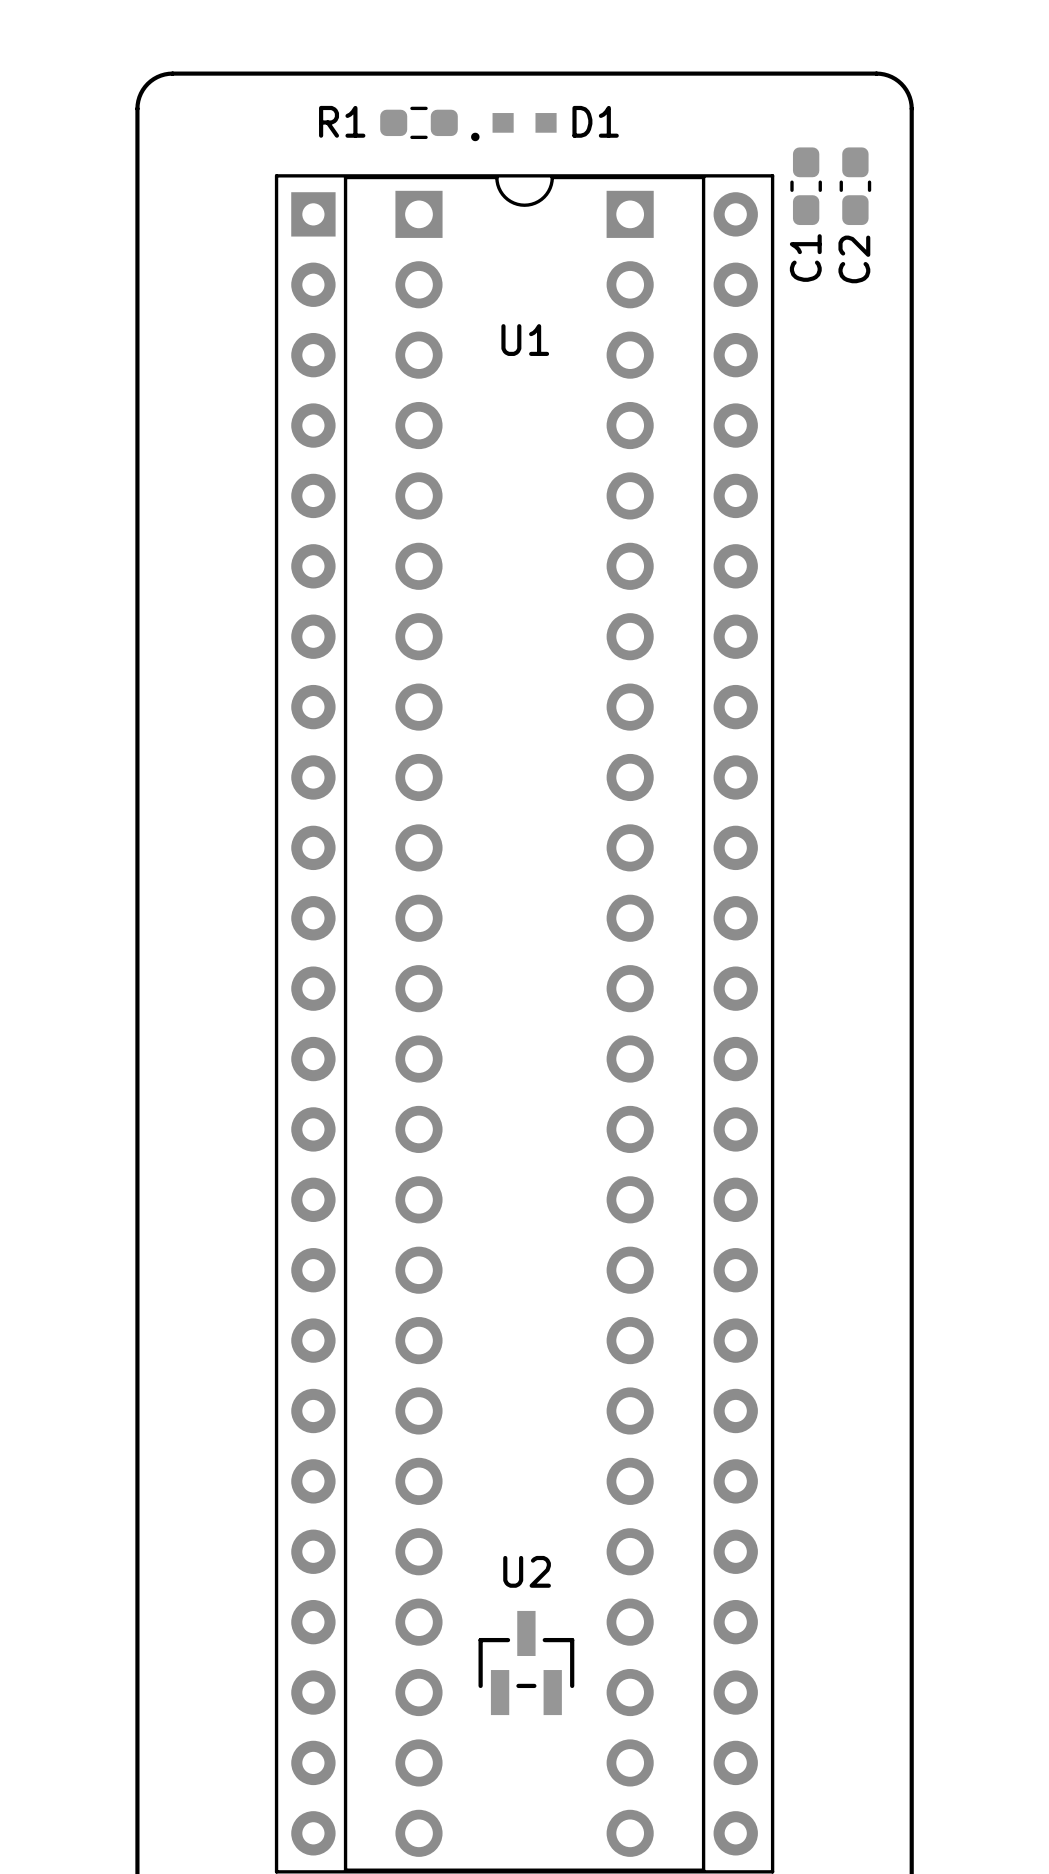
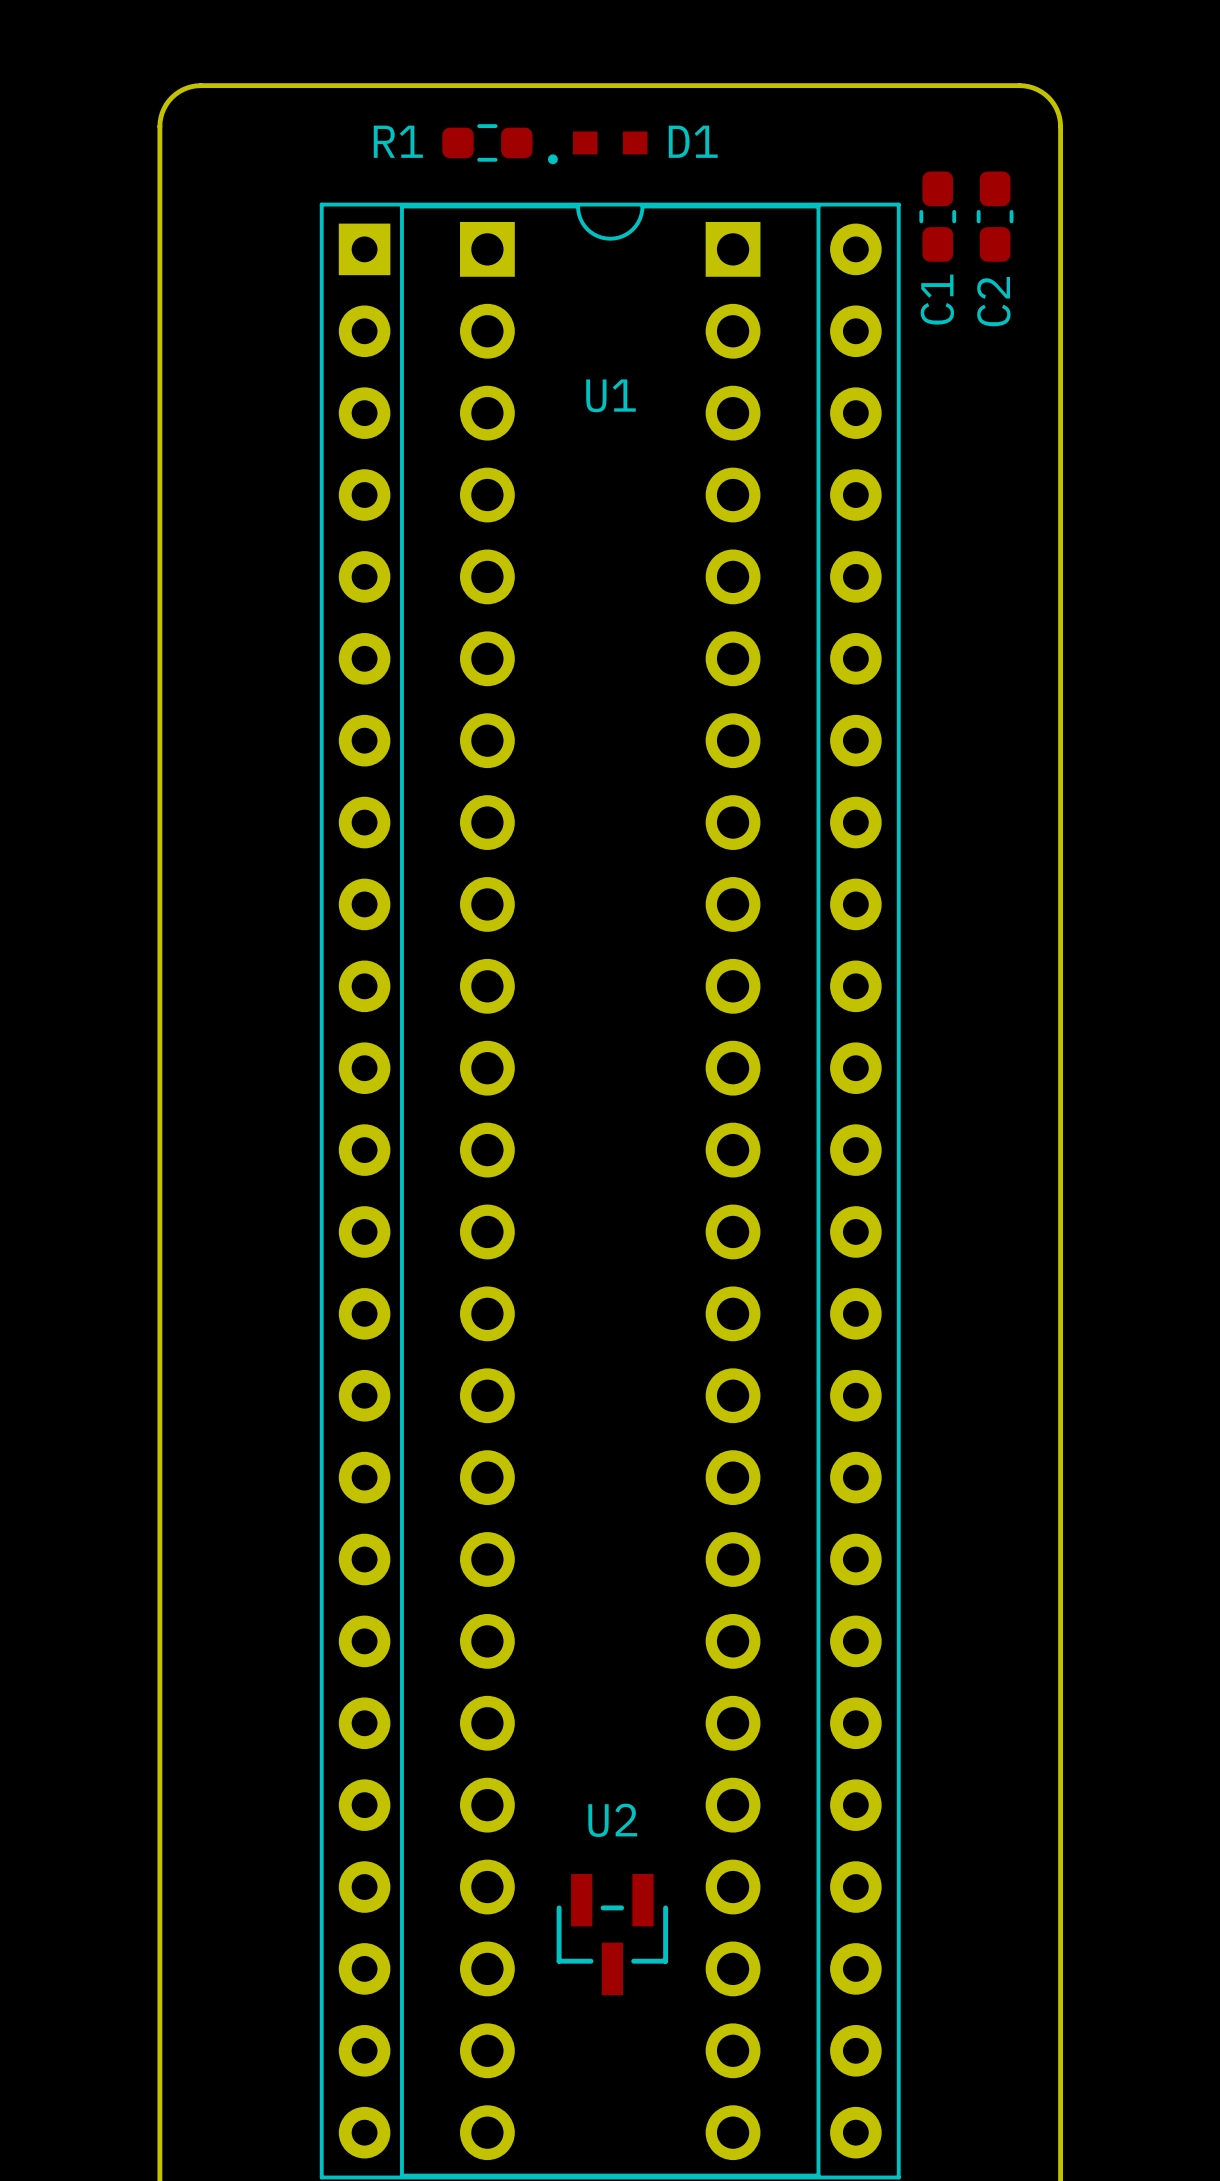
U2 rotation: 0° (526, 1663) -> 180° (612, 1934)

